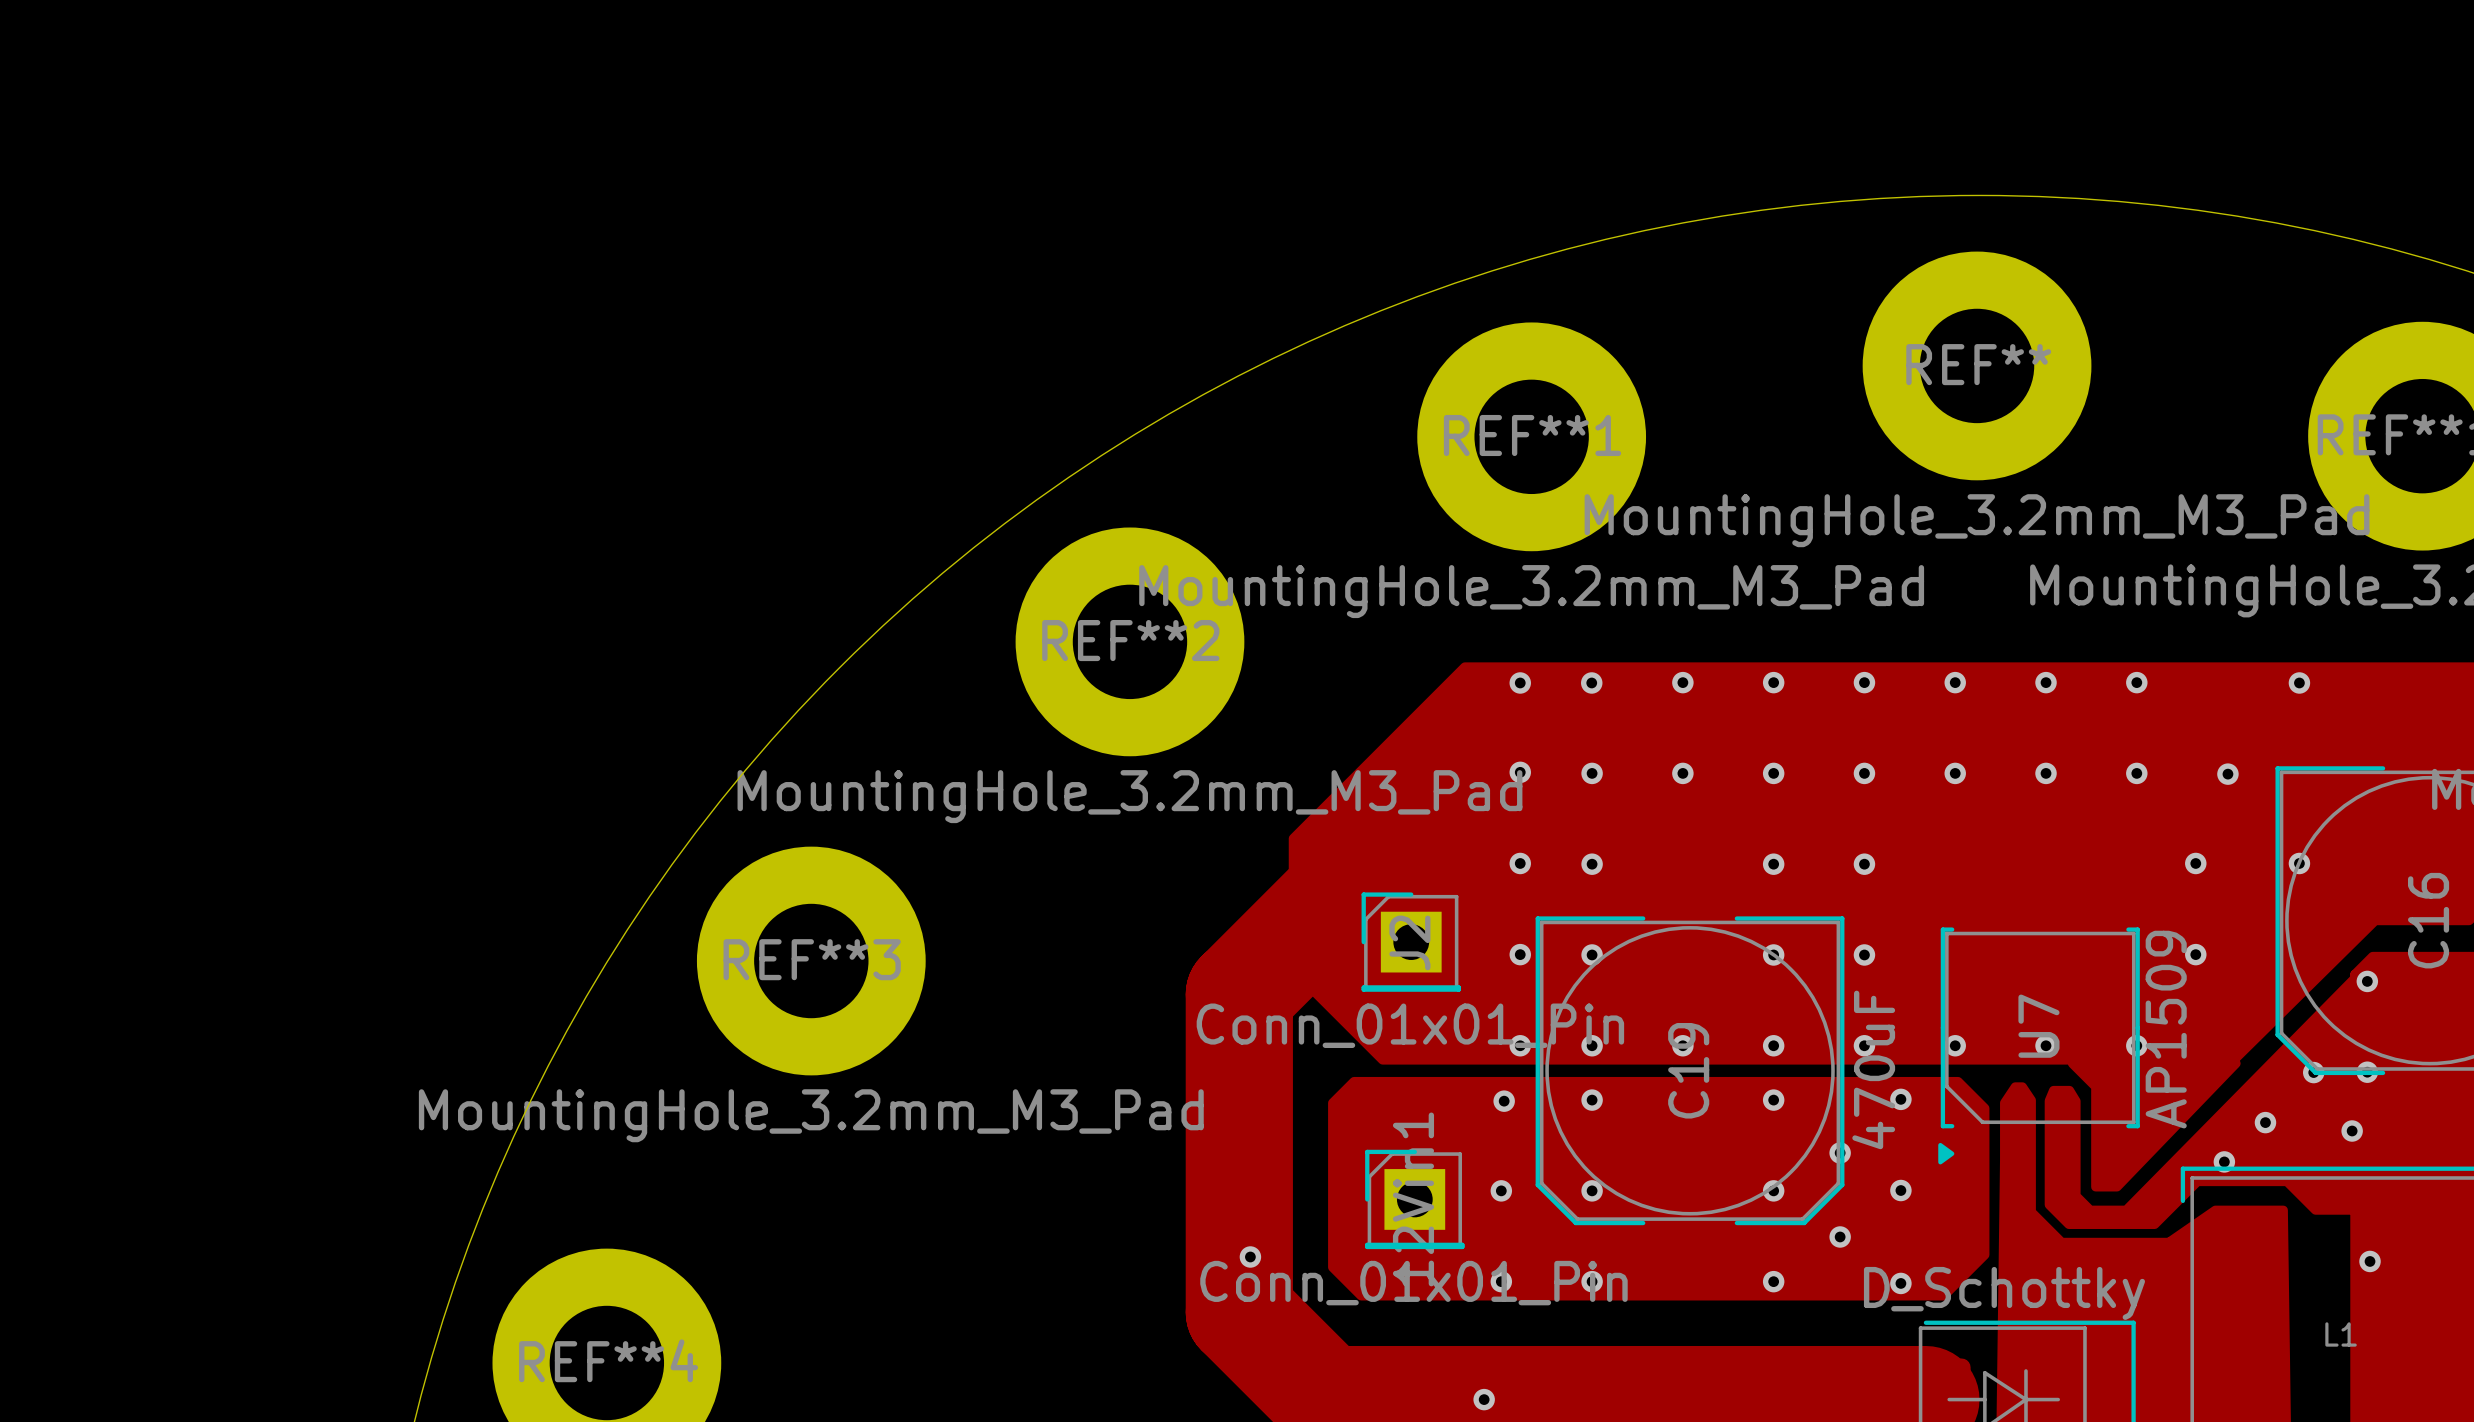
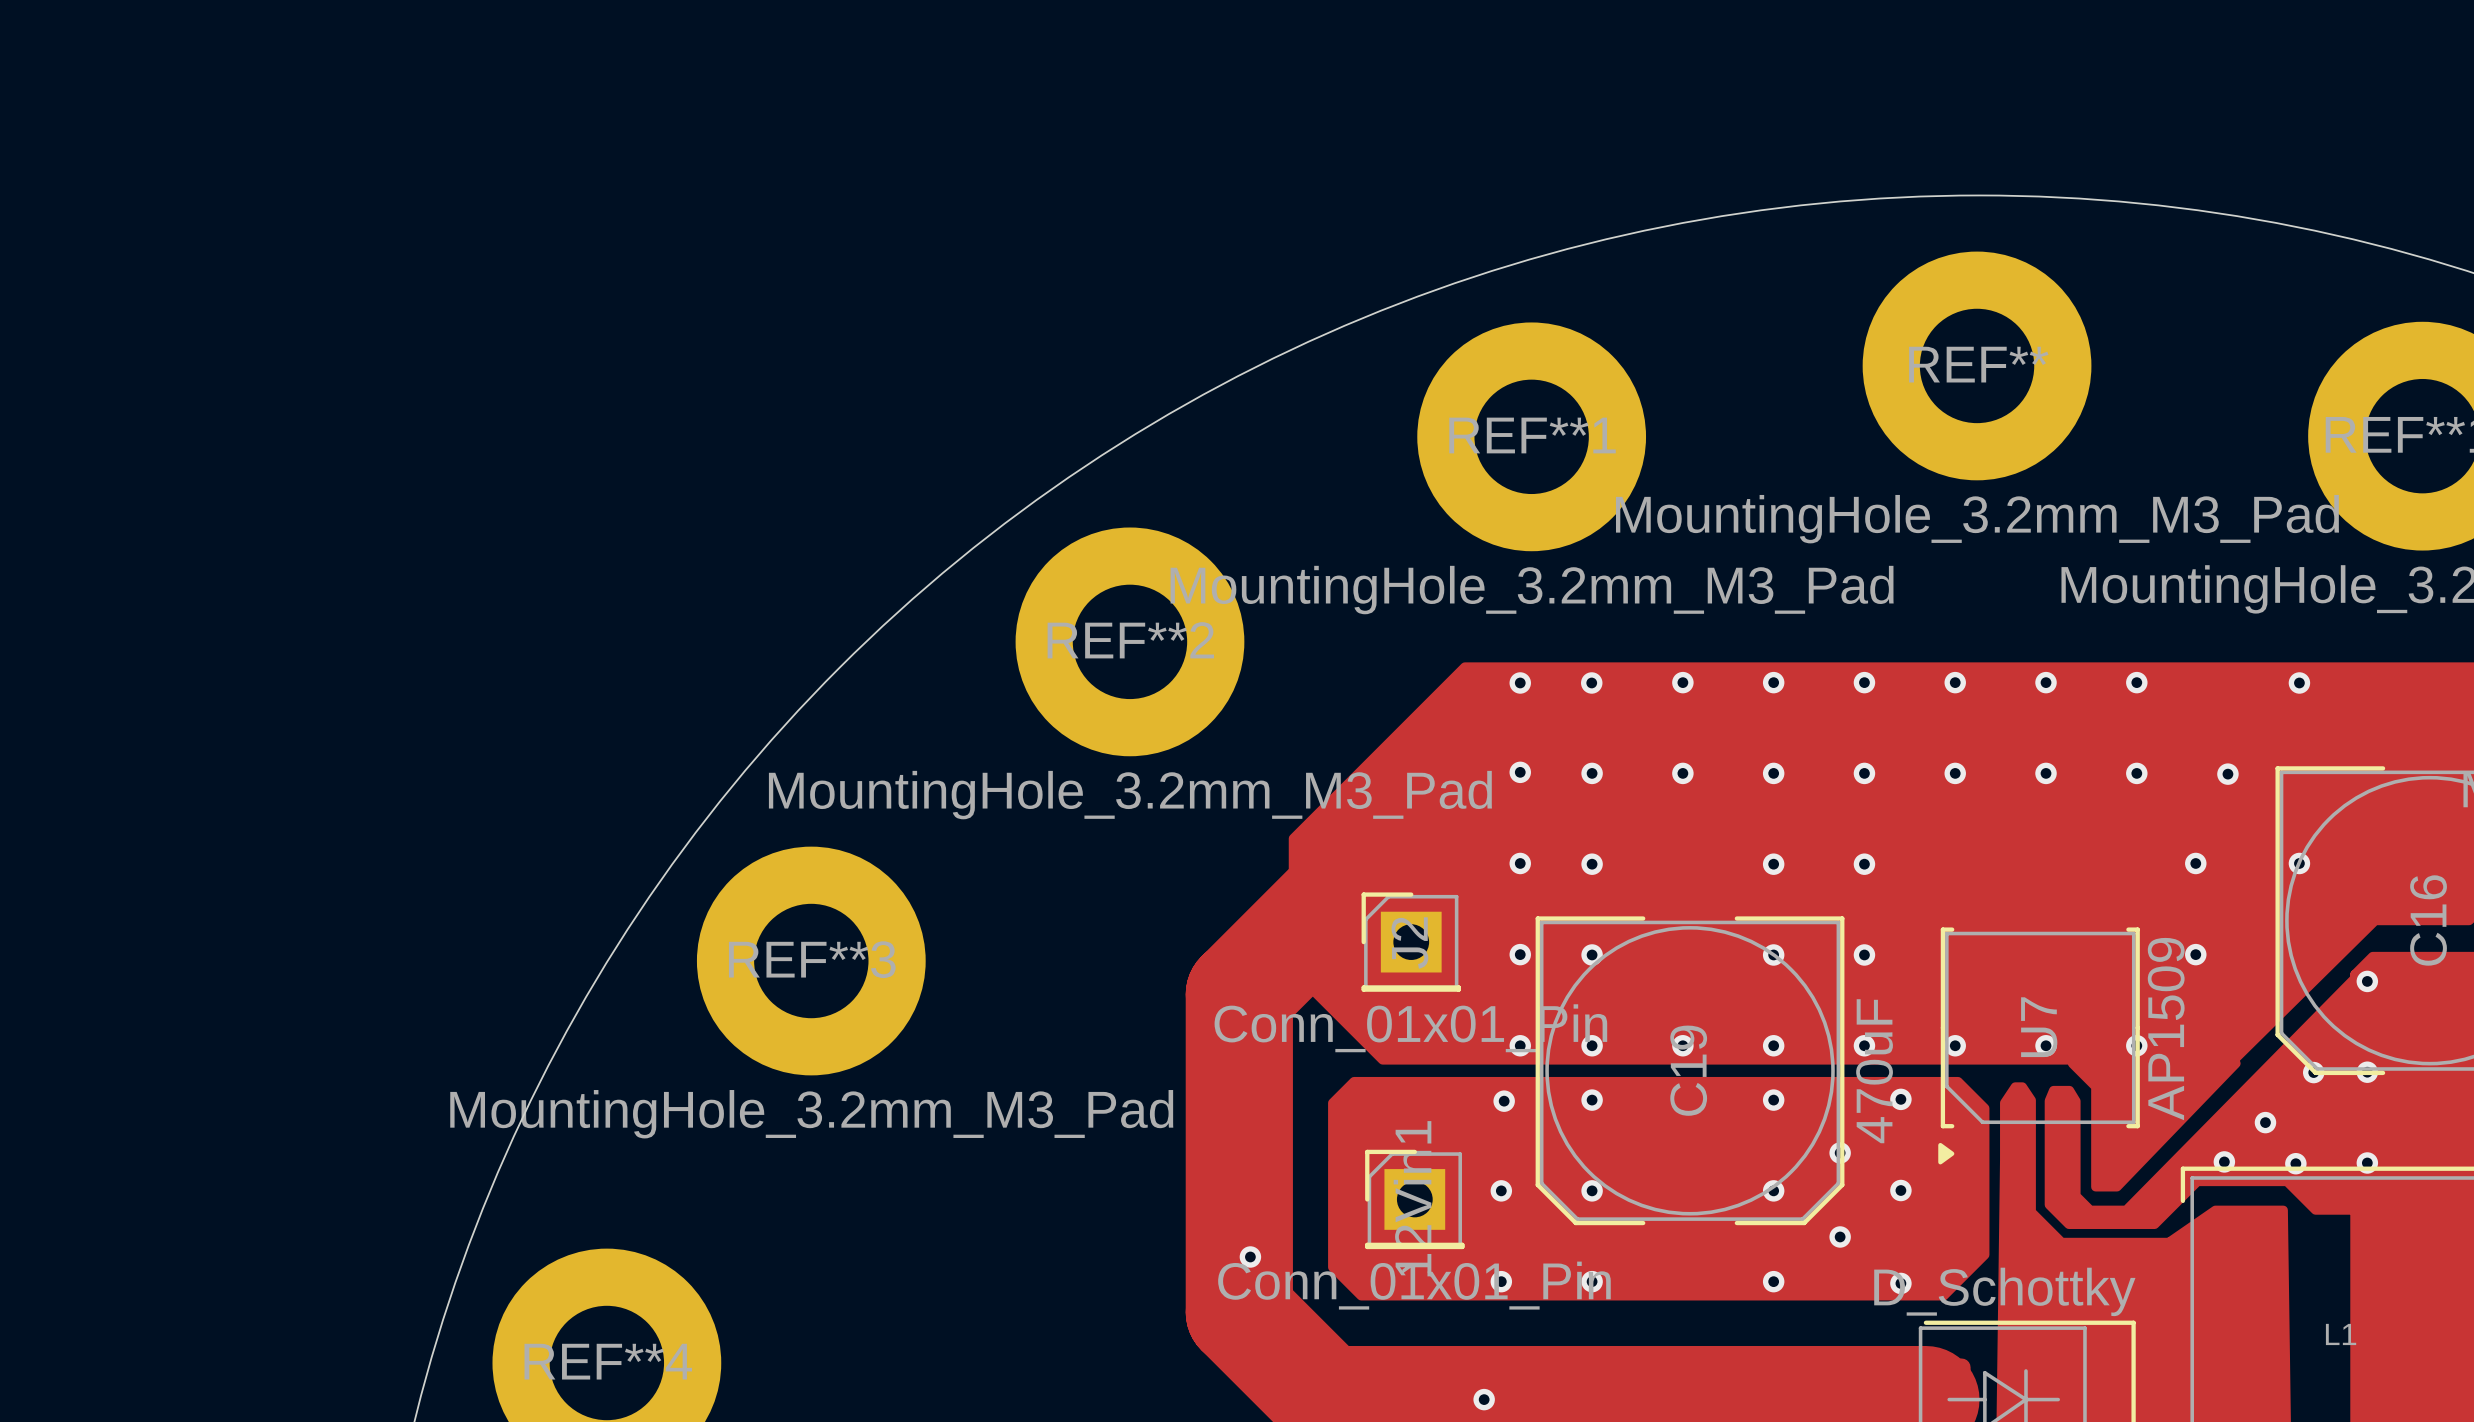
via: (2352, 1131) -> none
via: none -> (2367, 1162)
via: none -> (2295, 1163)
via: (2370, 1261) -> none

